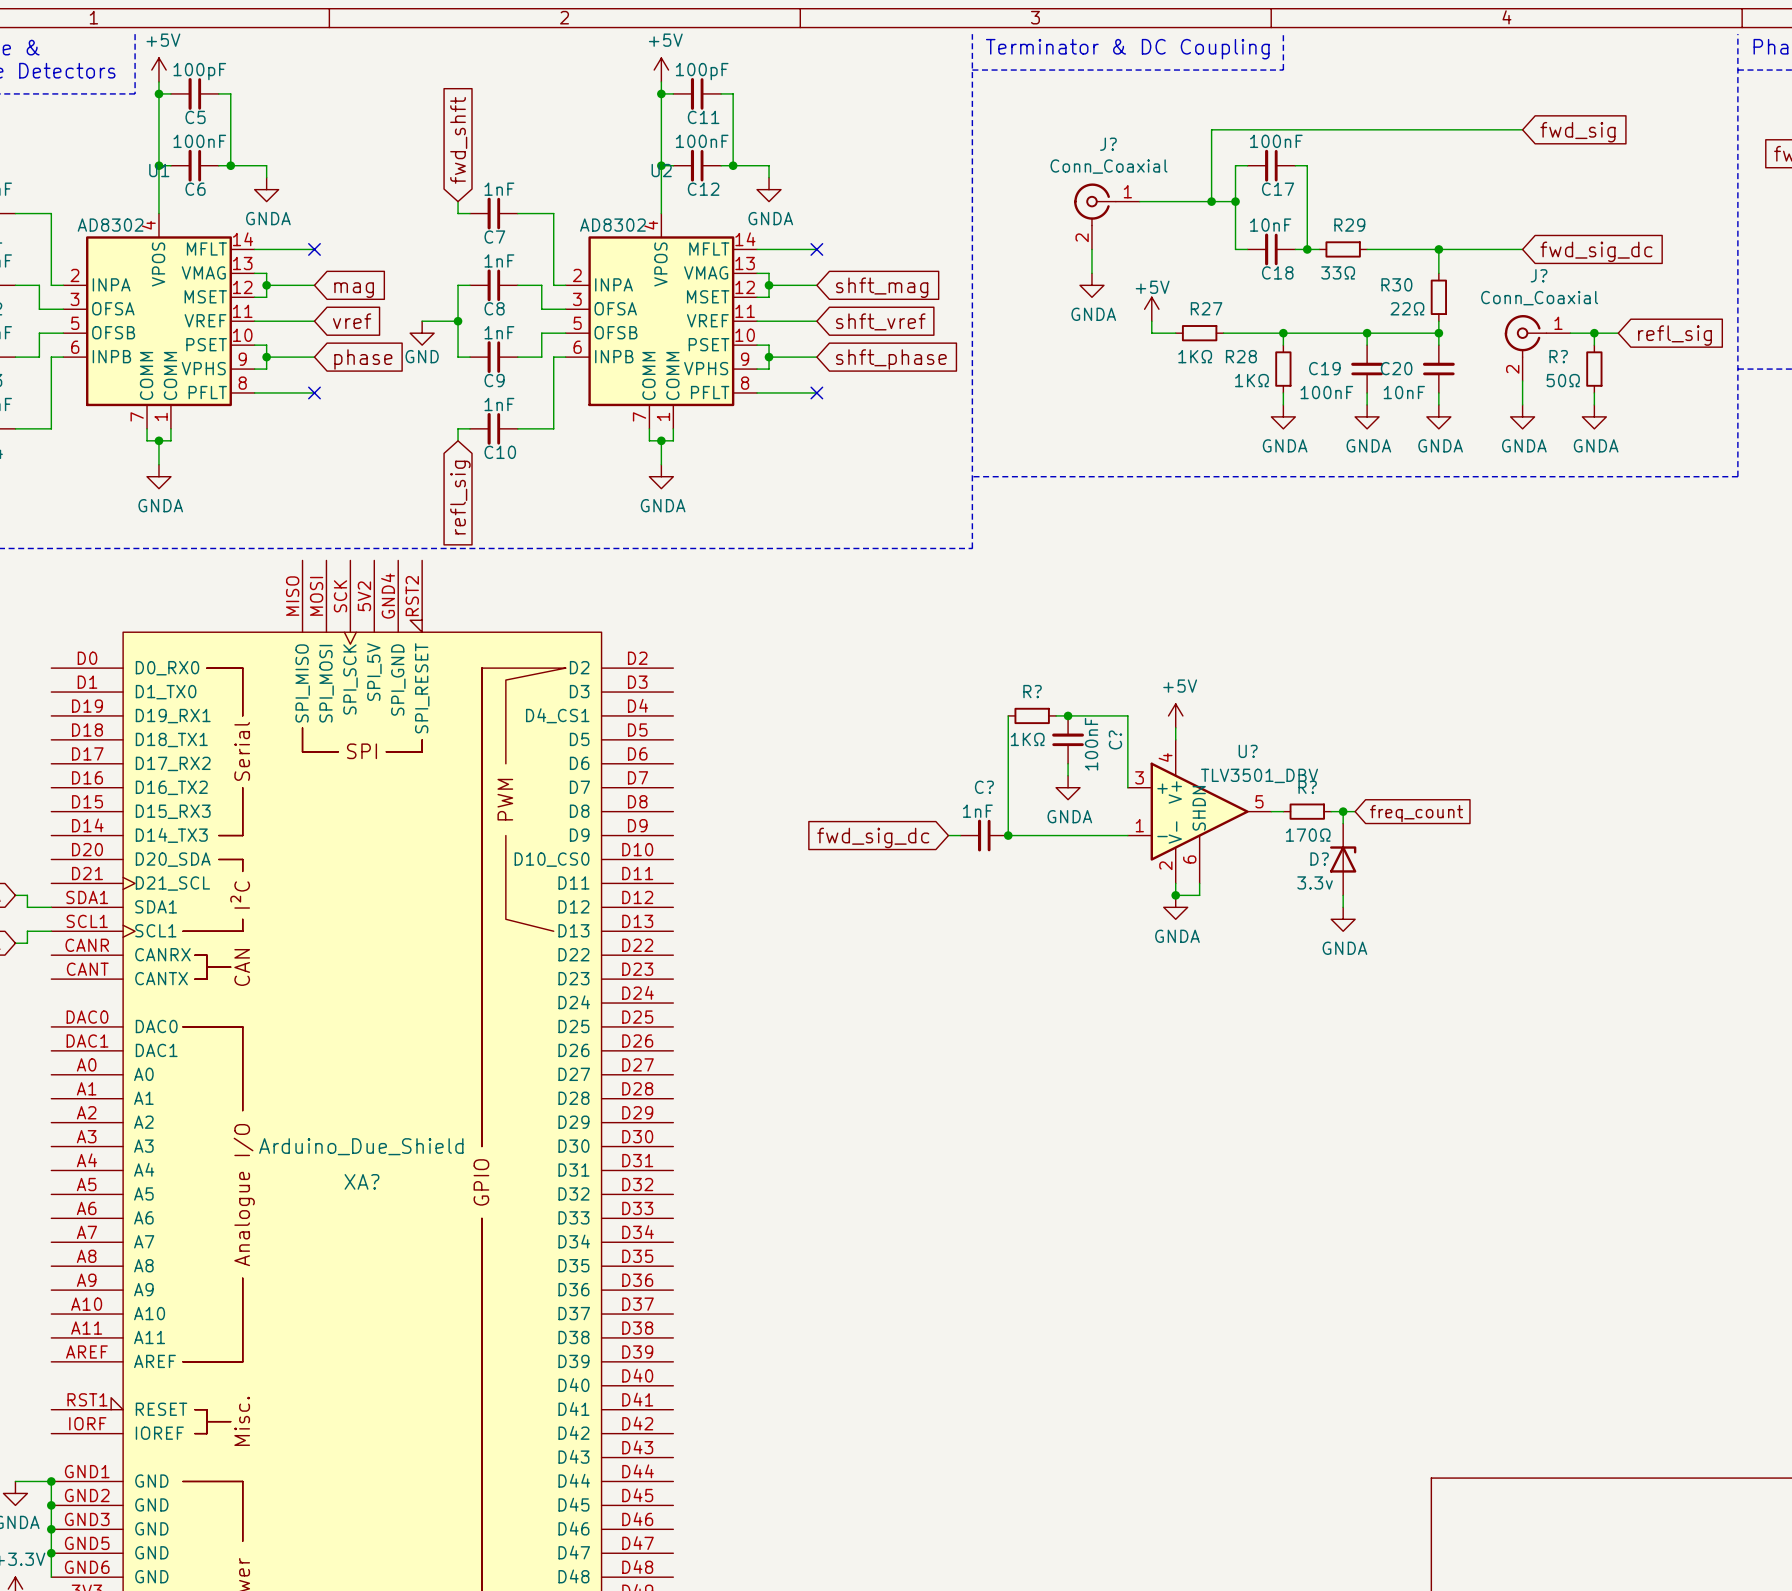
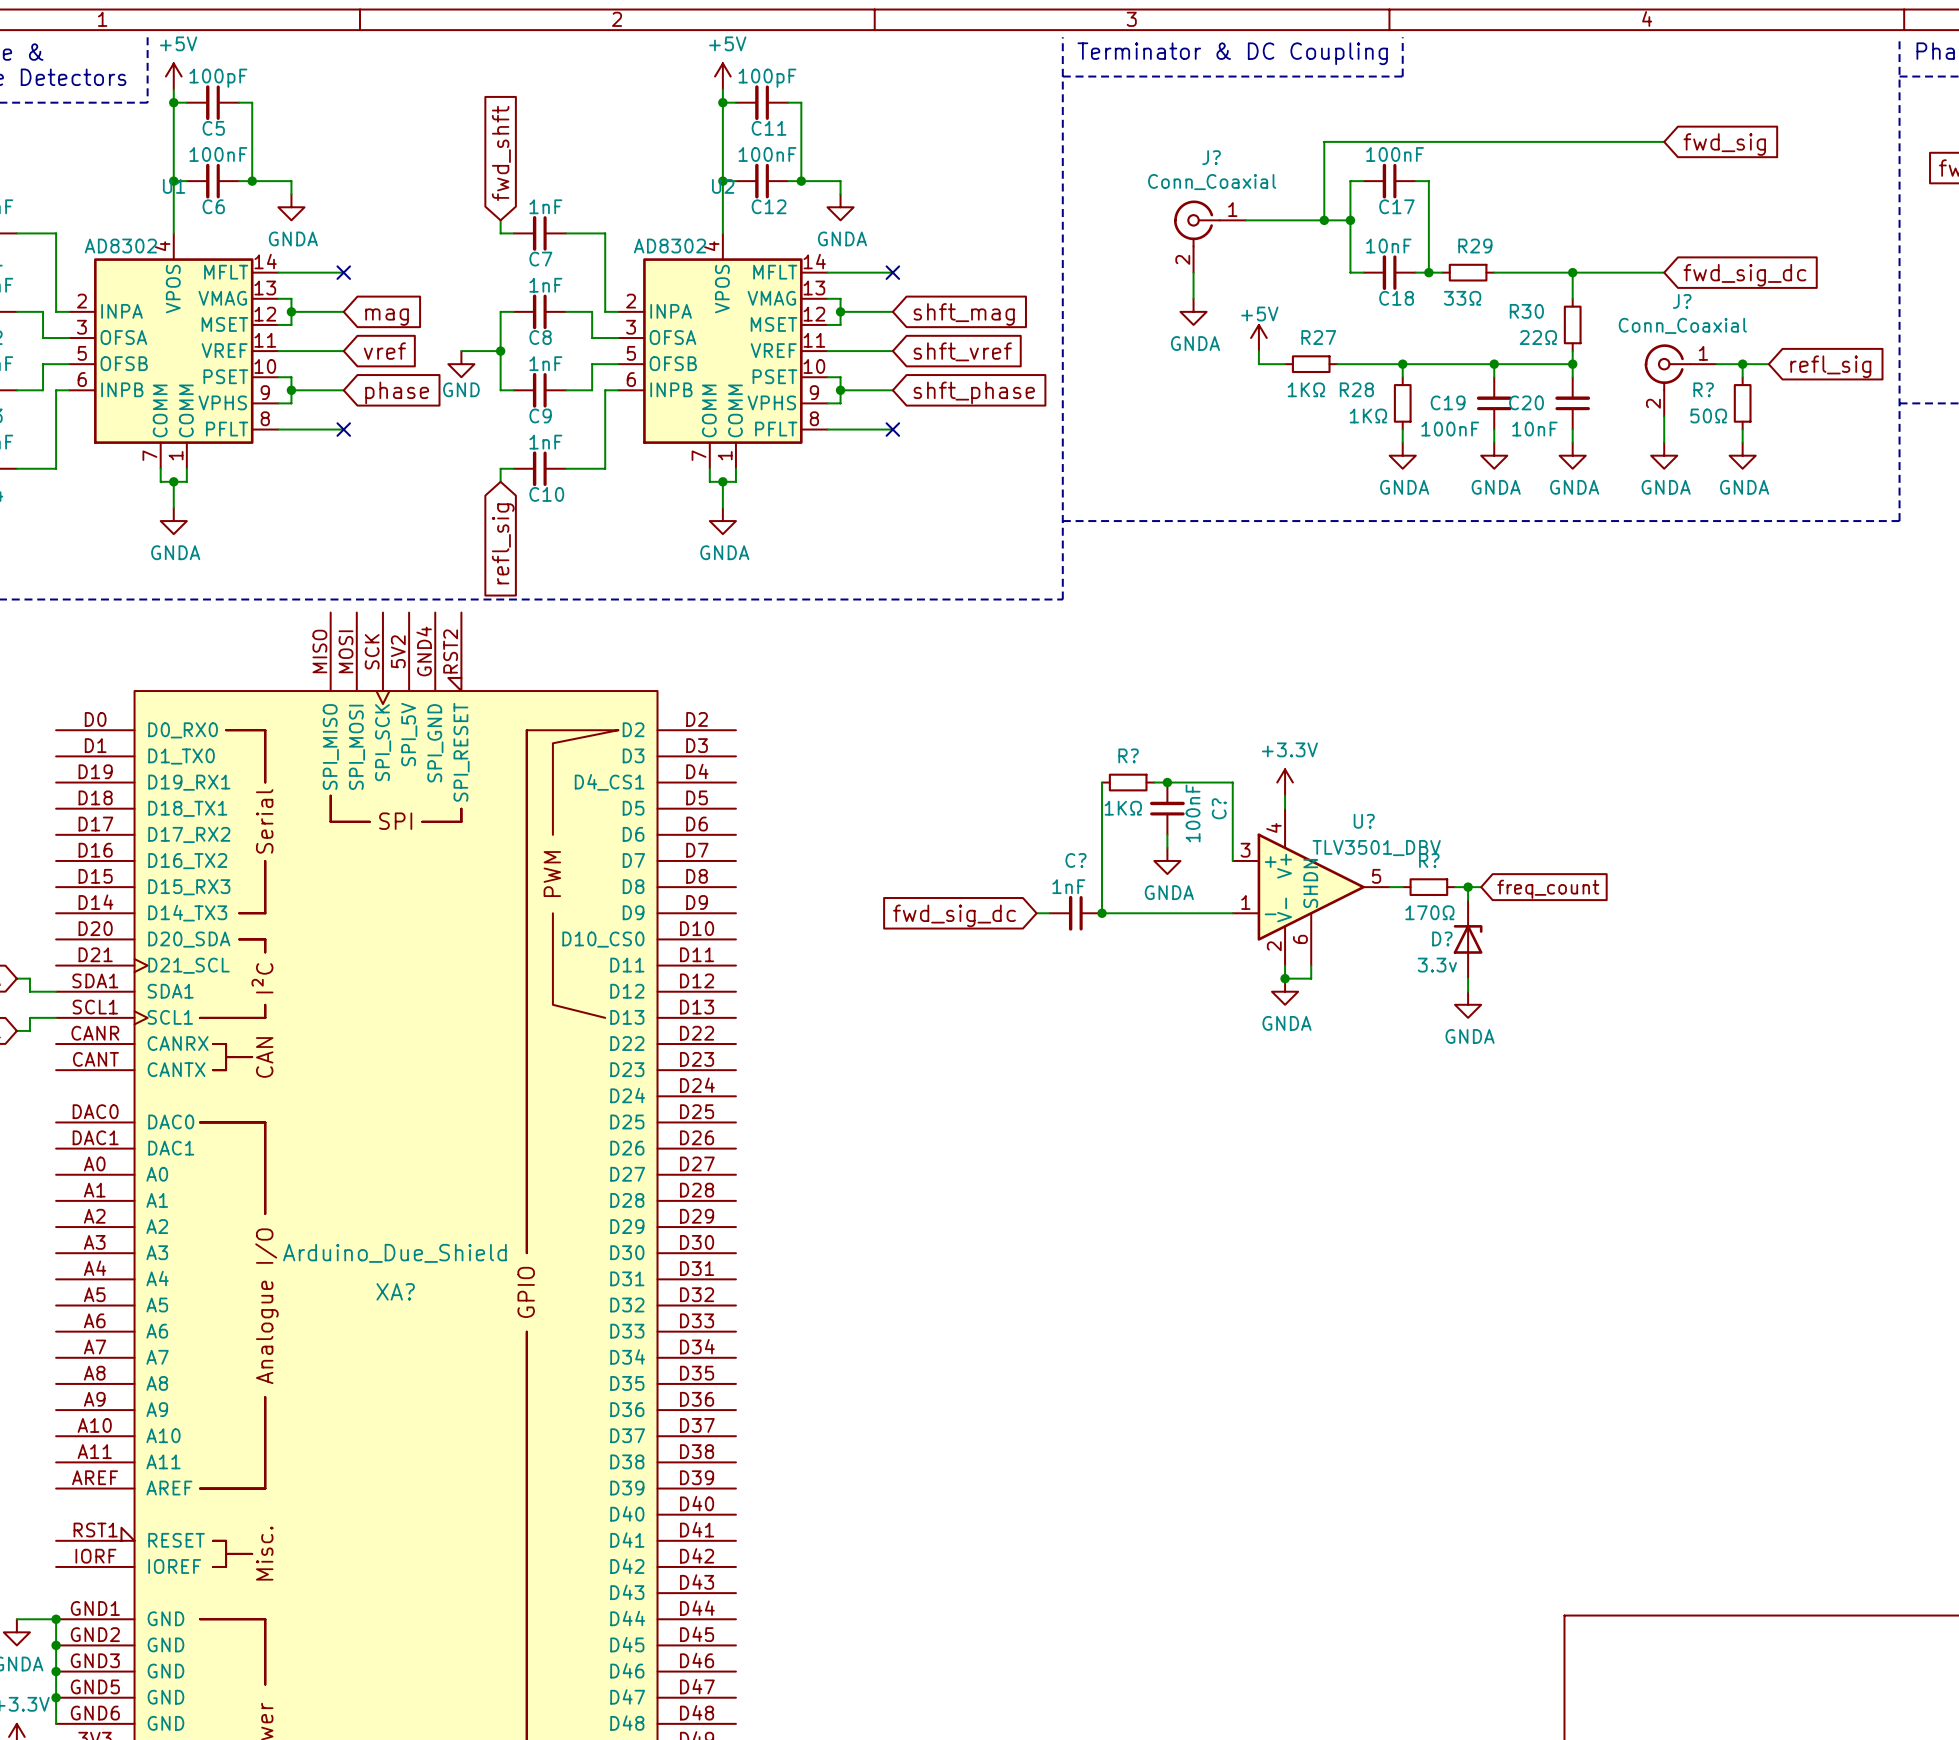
power symbol: +5V (1175, 715) -> +3.3V (1285, 782)

